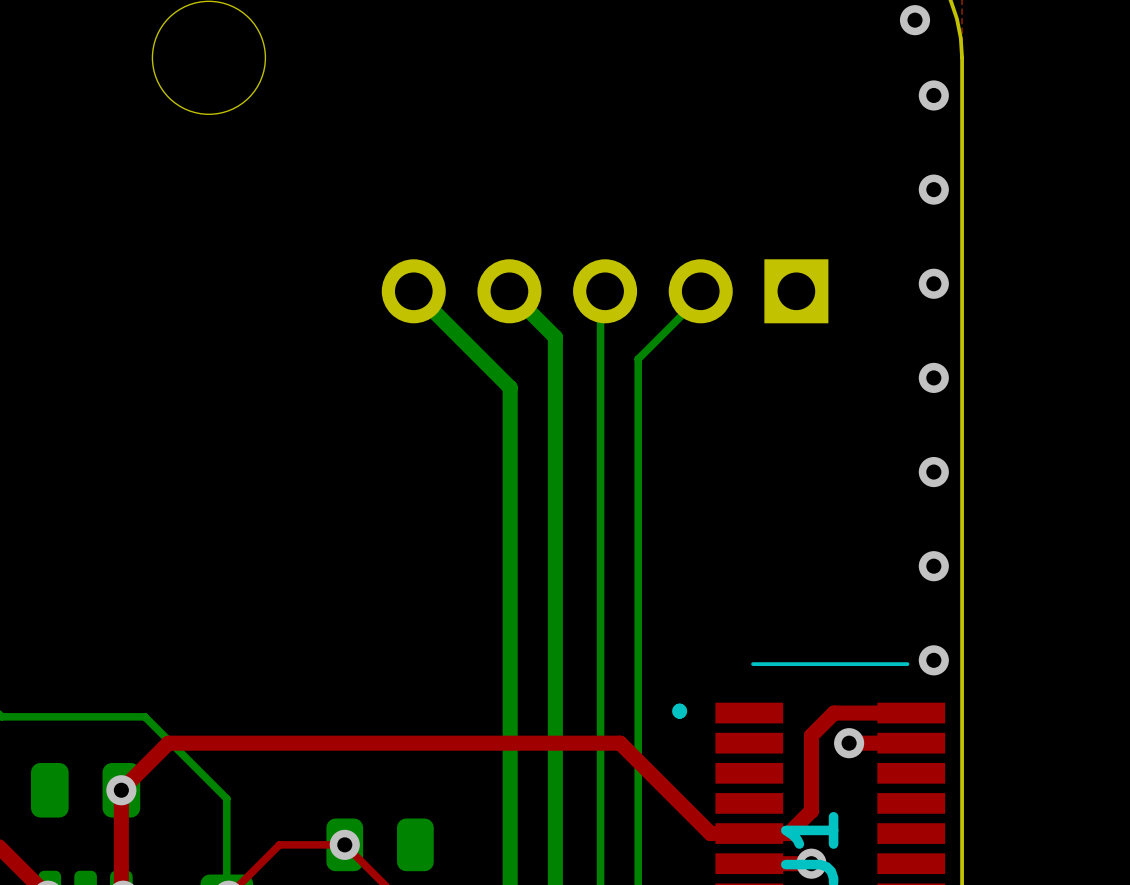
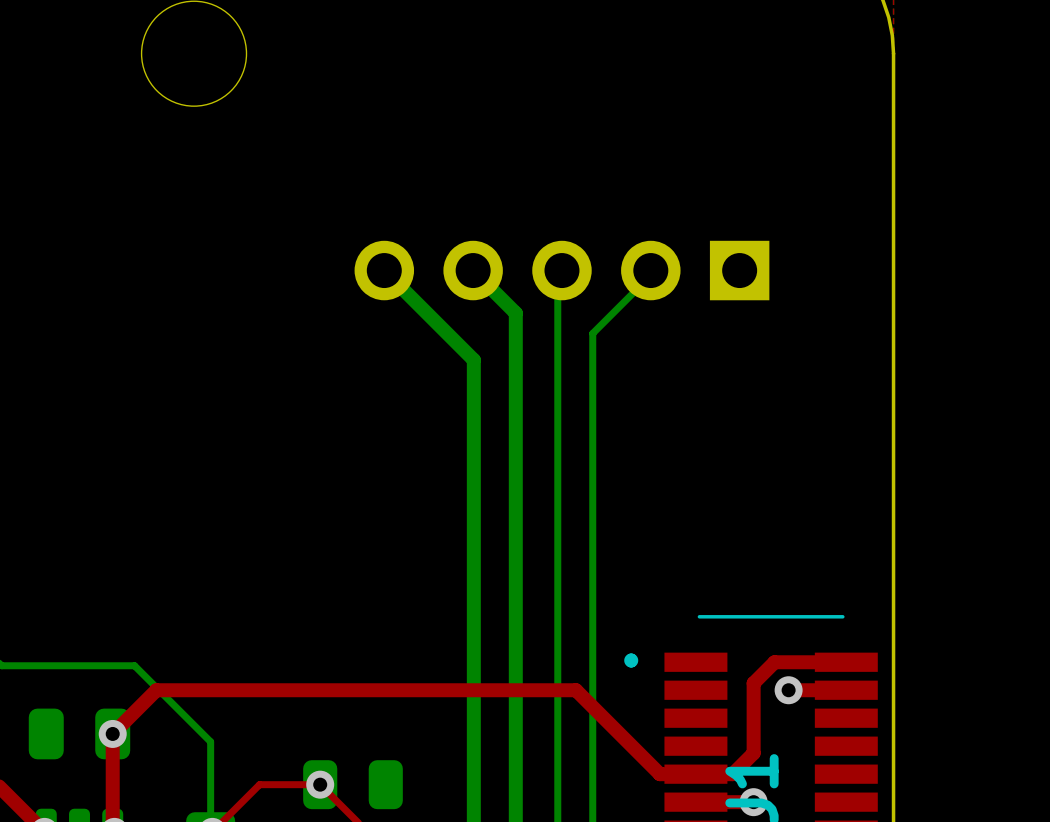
via: (915, 20) -> none
via: (933, 95) -> none
via: (933, 189) -> none
via: (933, 283) -> none
via: (933, 377) -> none
via: (933, 472) -> none
via: (933, 566) -> none
via: (933, 660) -> none

